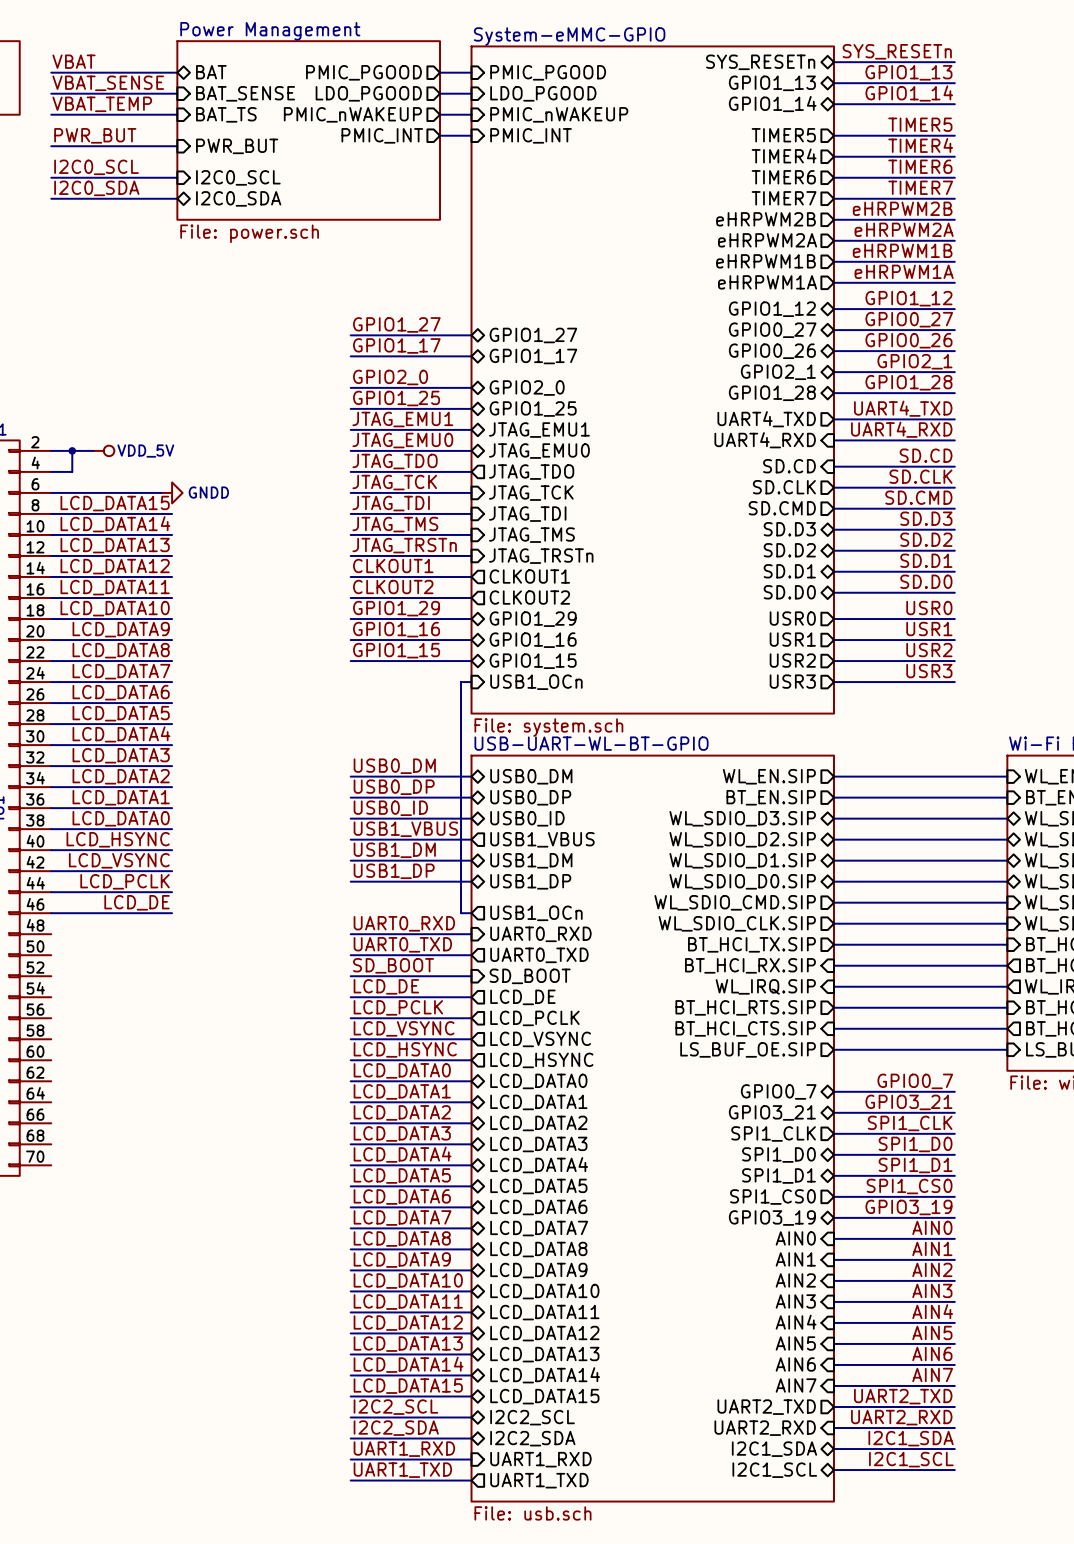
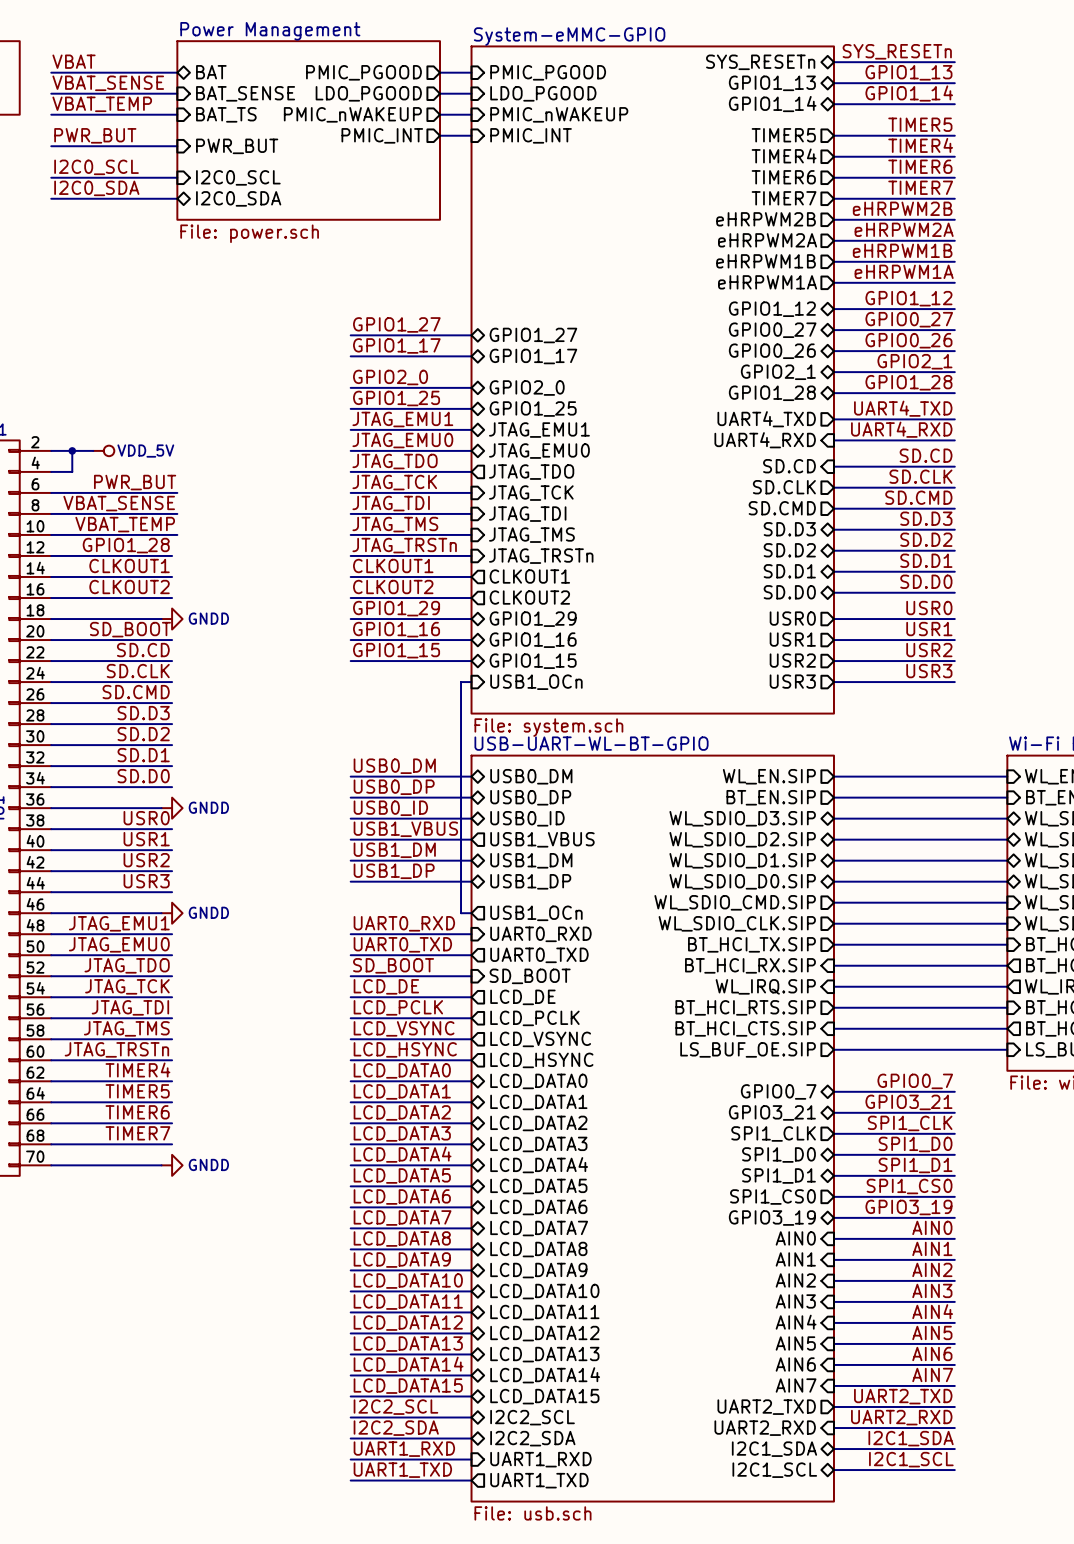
label: none -> PWR_BUT (135, 482)
power symbol position: GNDD (172, 492) -> GNDD (172, 619)
label: LCD_DATA15 (115, 503) -> VBAT_SENSE (119, 503)
wire: none -> (172, 513) (177, 513)
label: LCD_DATA14 (115, 524) -> VBAT_TEMP (125, 524)
wire: none -> (172, 534) (177, 534)
label: LCD_DATA13 (115, 545) -> GPIO1_28 (126, 545)
label: LCD_DATA12 (115, 566) -> CLKOUT1 (129, 565)
label: LCD_DATA11 (115, 587) -> CLKOUT2 (129, 587)
label: LCD_DATA10 (115, 608) -> none
label: LCD_DATA9 (121, 629) -> SD_BOOT (130, 629)
label: LCD_DATA8 (121, 650) -> SD.CD (143, 650)
label: LCD_DATA7 (121, 671) -> SD.CLK (138, 671)
label: LCD_DATA6 (121, 692) -> SD.CMD (136, 692)
label: LCD_DATA5 (121, 713) -> SD.D3 (143, 713)
label: LCD_DATA4 (121, 734) -> SD.D2 (143, 734)
label: LCD_DATA3 (121, 755) -> SD.D1 (143, 755)
label: LCD_DATA2 (121, 776) -> SD.D0 (143, 776)
label: LCD_DATA1 (121, 797) -> none
power symbol: none -> GNDD (172, 808)
label: LCD_DATA0 (121, 818) -> USR0 (146, 818)
label: LCD_HSYNC (118, 839) -> USR1 (146, 839)
label: LCD_VSYNC (119, 860) -> USR2 (146, 860)
label: LCD_PCLK (125, 881) -> USR3 (146, 881)
label: LCD_DE (137, 902) -> none
power symbol: none -> GNDD (172, 913)
label: none -> JTAG_EMU1 (119, 923)
wire: none -> (51, 934) (172, 934)
label: none -> JTAG_EMU0 (119, 944)
wire: none -> (51, 955) (172, 955)
label: none -> JTAG_TDO (127, 965)
wire: none -> (51, 976) (172, 976)
label: none -> JTAG_TCK (127, 986)
wire: none -> (51, 997) (172, 997)
label: none -> JTAG_TDI (130, 1007)
wire: none -> (51, 1018) (172, 1018)
label: none -> JTAG_TMS (126, 1028)
wire: none -> (51, 1039) (172, 1039)
label: none -> JTAG_TRSTn (116, 1049)
wire: none -> (51, 1060) (172, 1060)
label: none -> TIMER4 (137, 1070)
wire: none -> (51, 1081) (172, 1081)
label: none -> TIMER5 (137, 1091)
wire: none -> (51, 1102) (172, 1102)
label: none -> TIMER6 (137, 1112)
wire: none -> (51, 1123) (172, 1123)
label: none -> TIMER7 (137, 1133)
wire: none -> (51, 1144) (172, 1144)
wire: none -> (51, 1165) (161, 1165)
power symbol: none -> GNDD (172, 1165)

